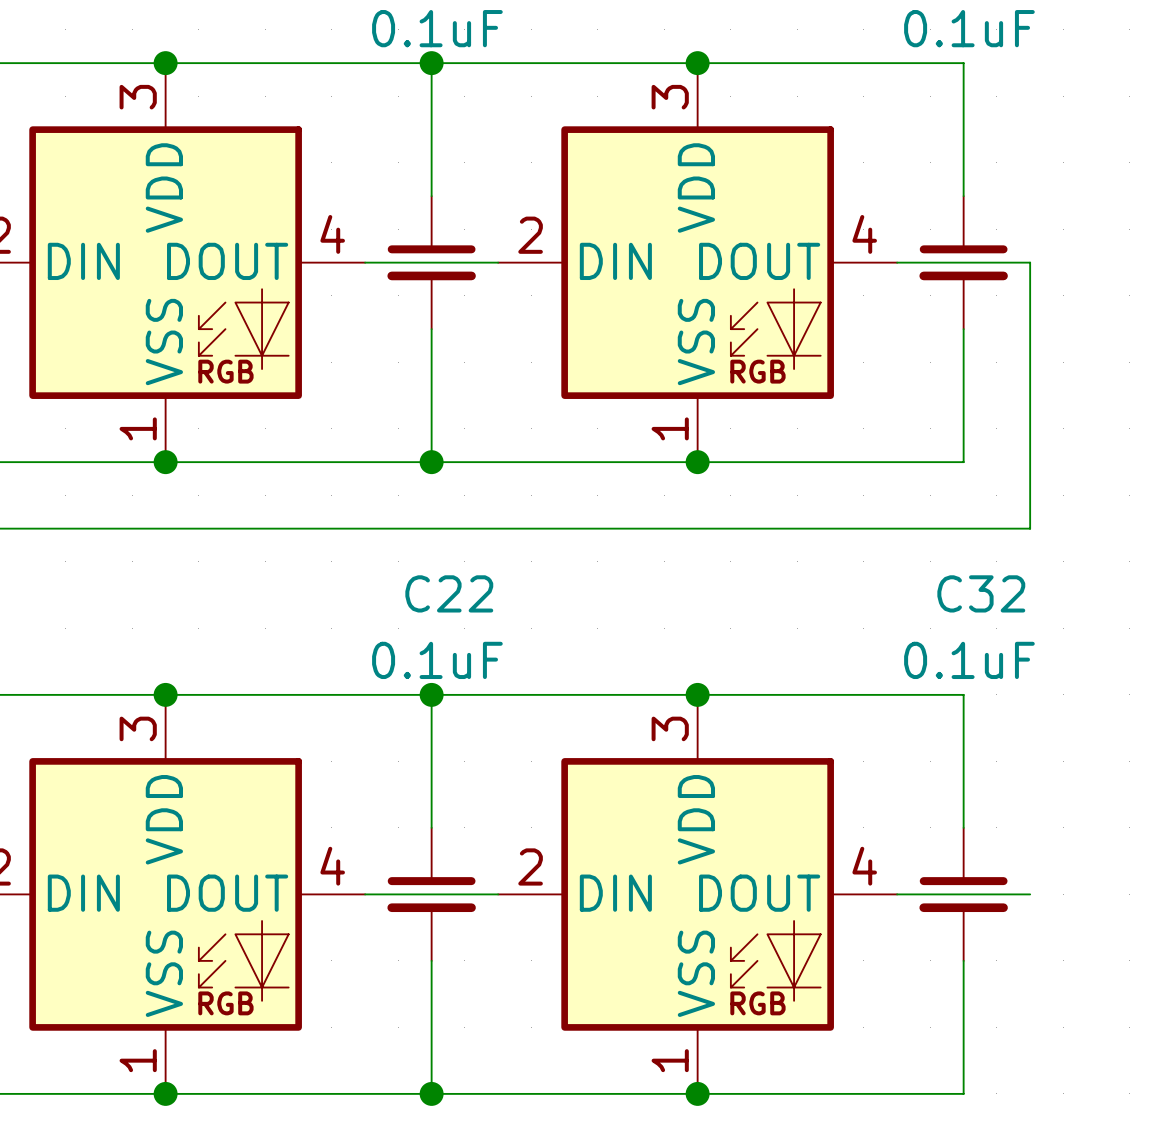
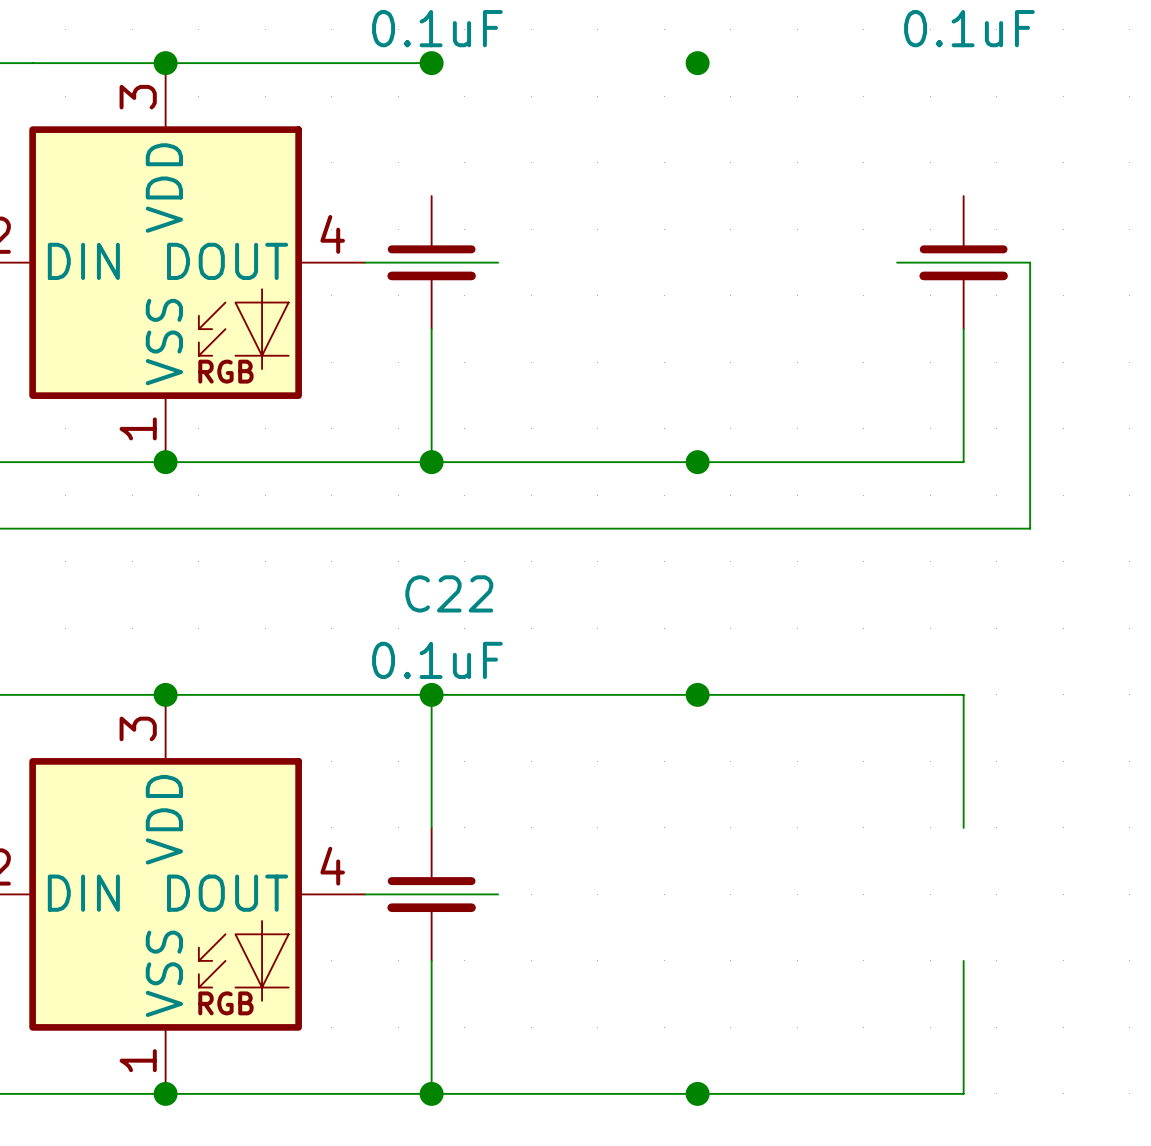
wire: (431, 196) (431, 63) (963, 63) (963, 196) -> none
part: (697, 262) -> none
part: (697, 894) -> none
wire: (897, 894) (1030, 894) -> none
C32: 0.1uF (963, 894) -> none

